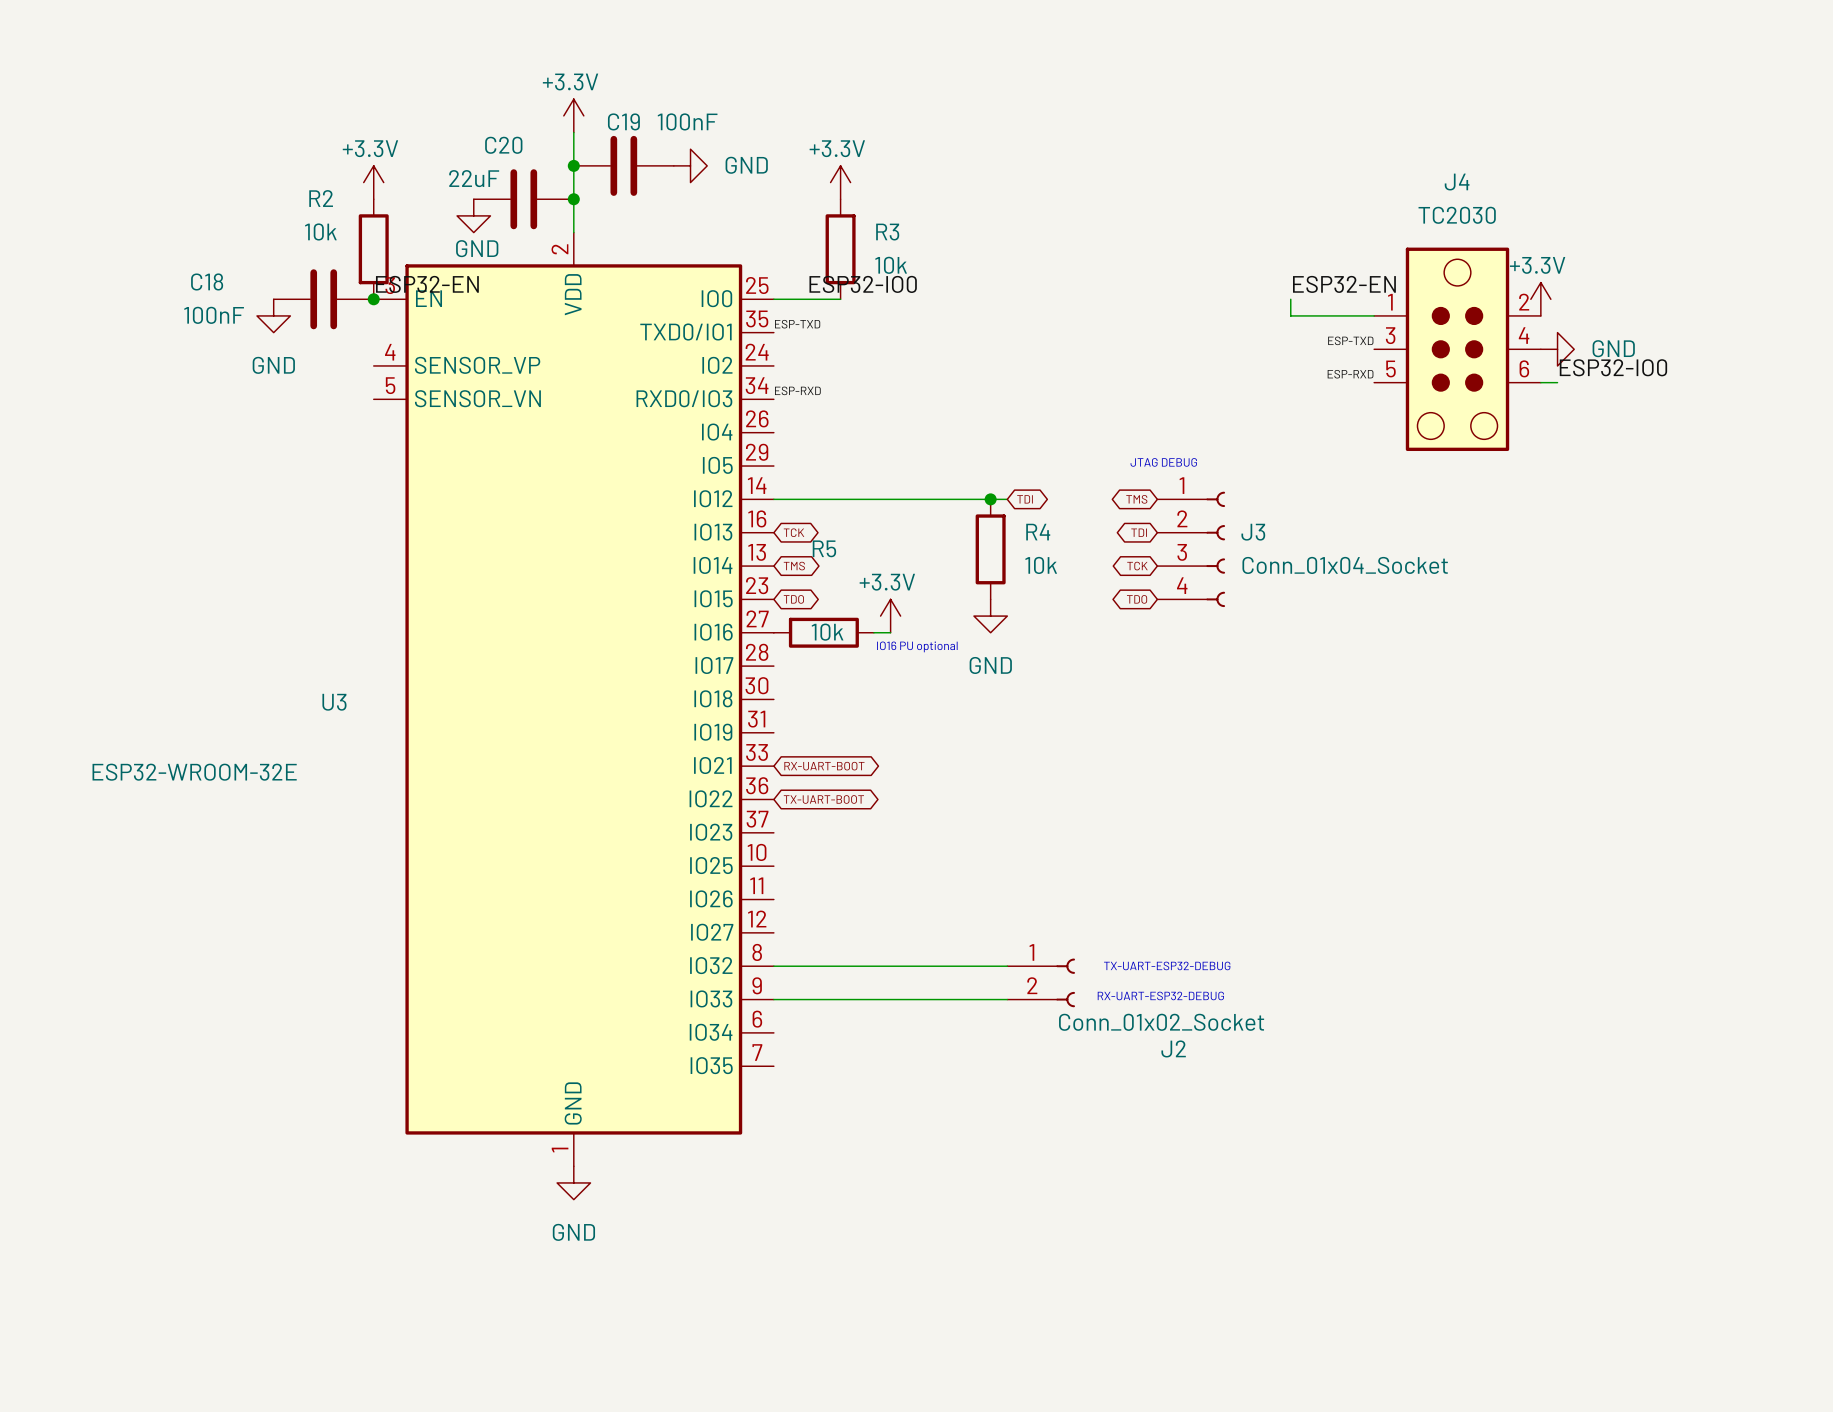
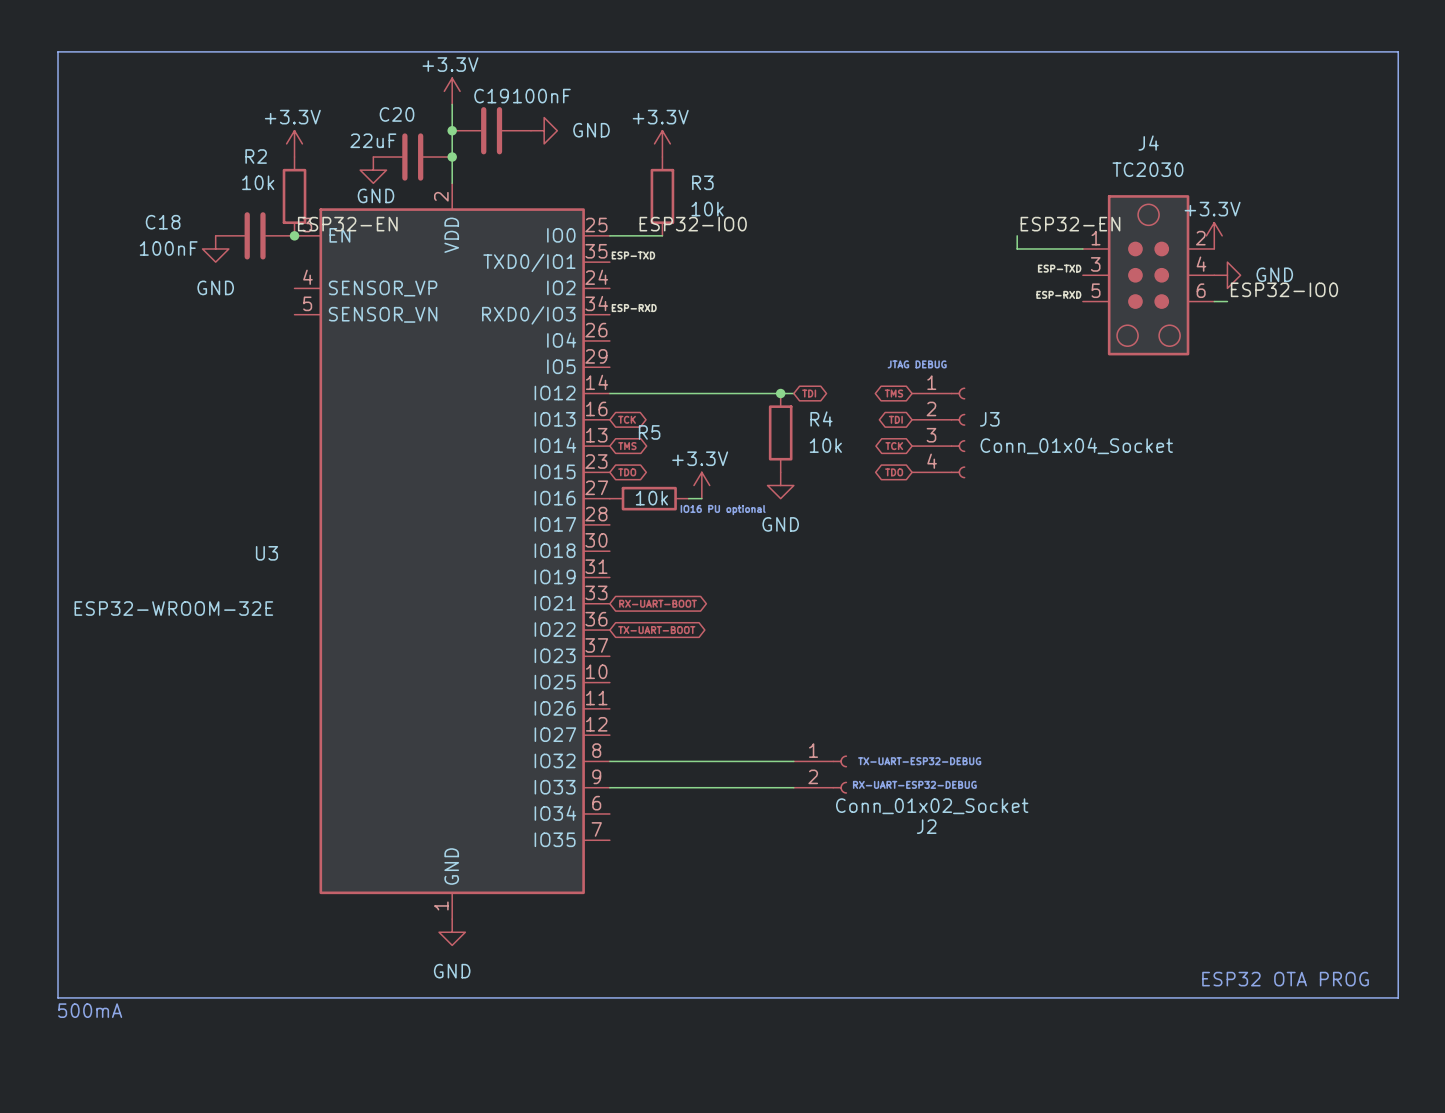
line: none -> (58, 51) (1398, 51) (1398, 997) (58, 997) (58, 51)
text: none -> ESP32 OTA PROG (1285, 979)
text: none -> 500mA (90, 1010)

